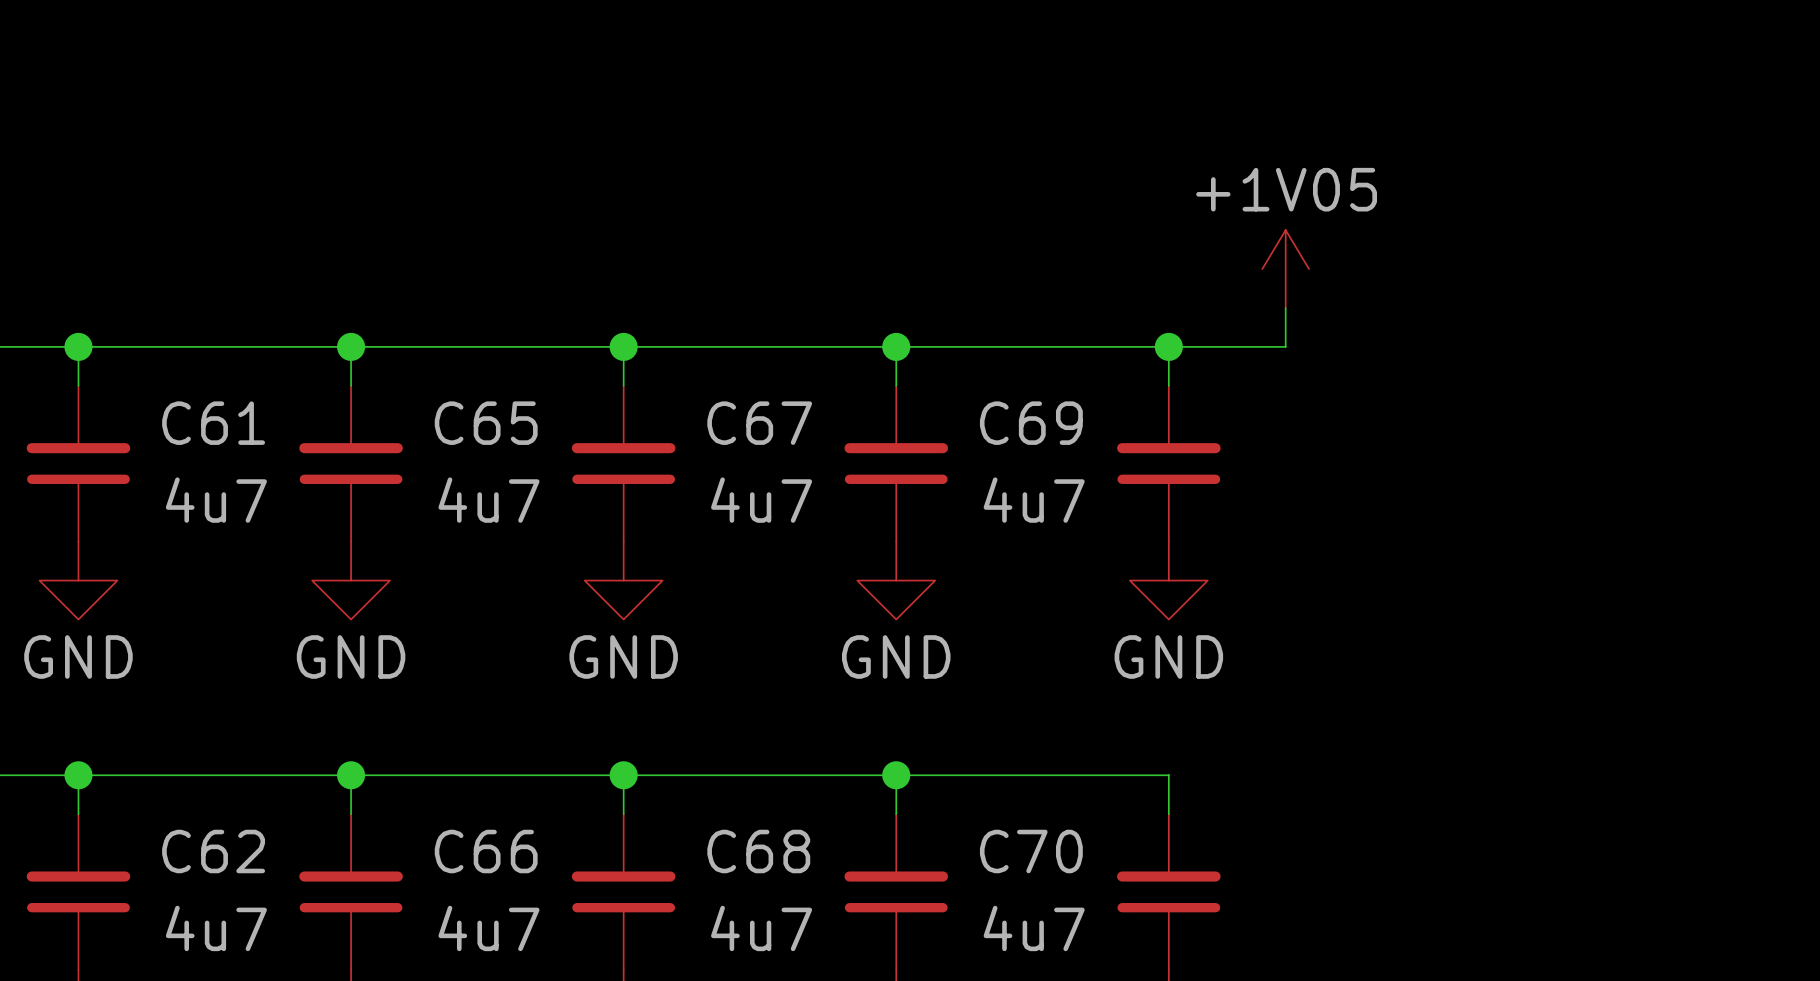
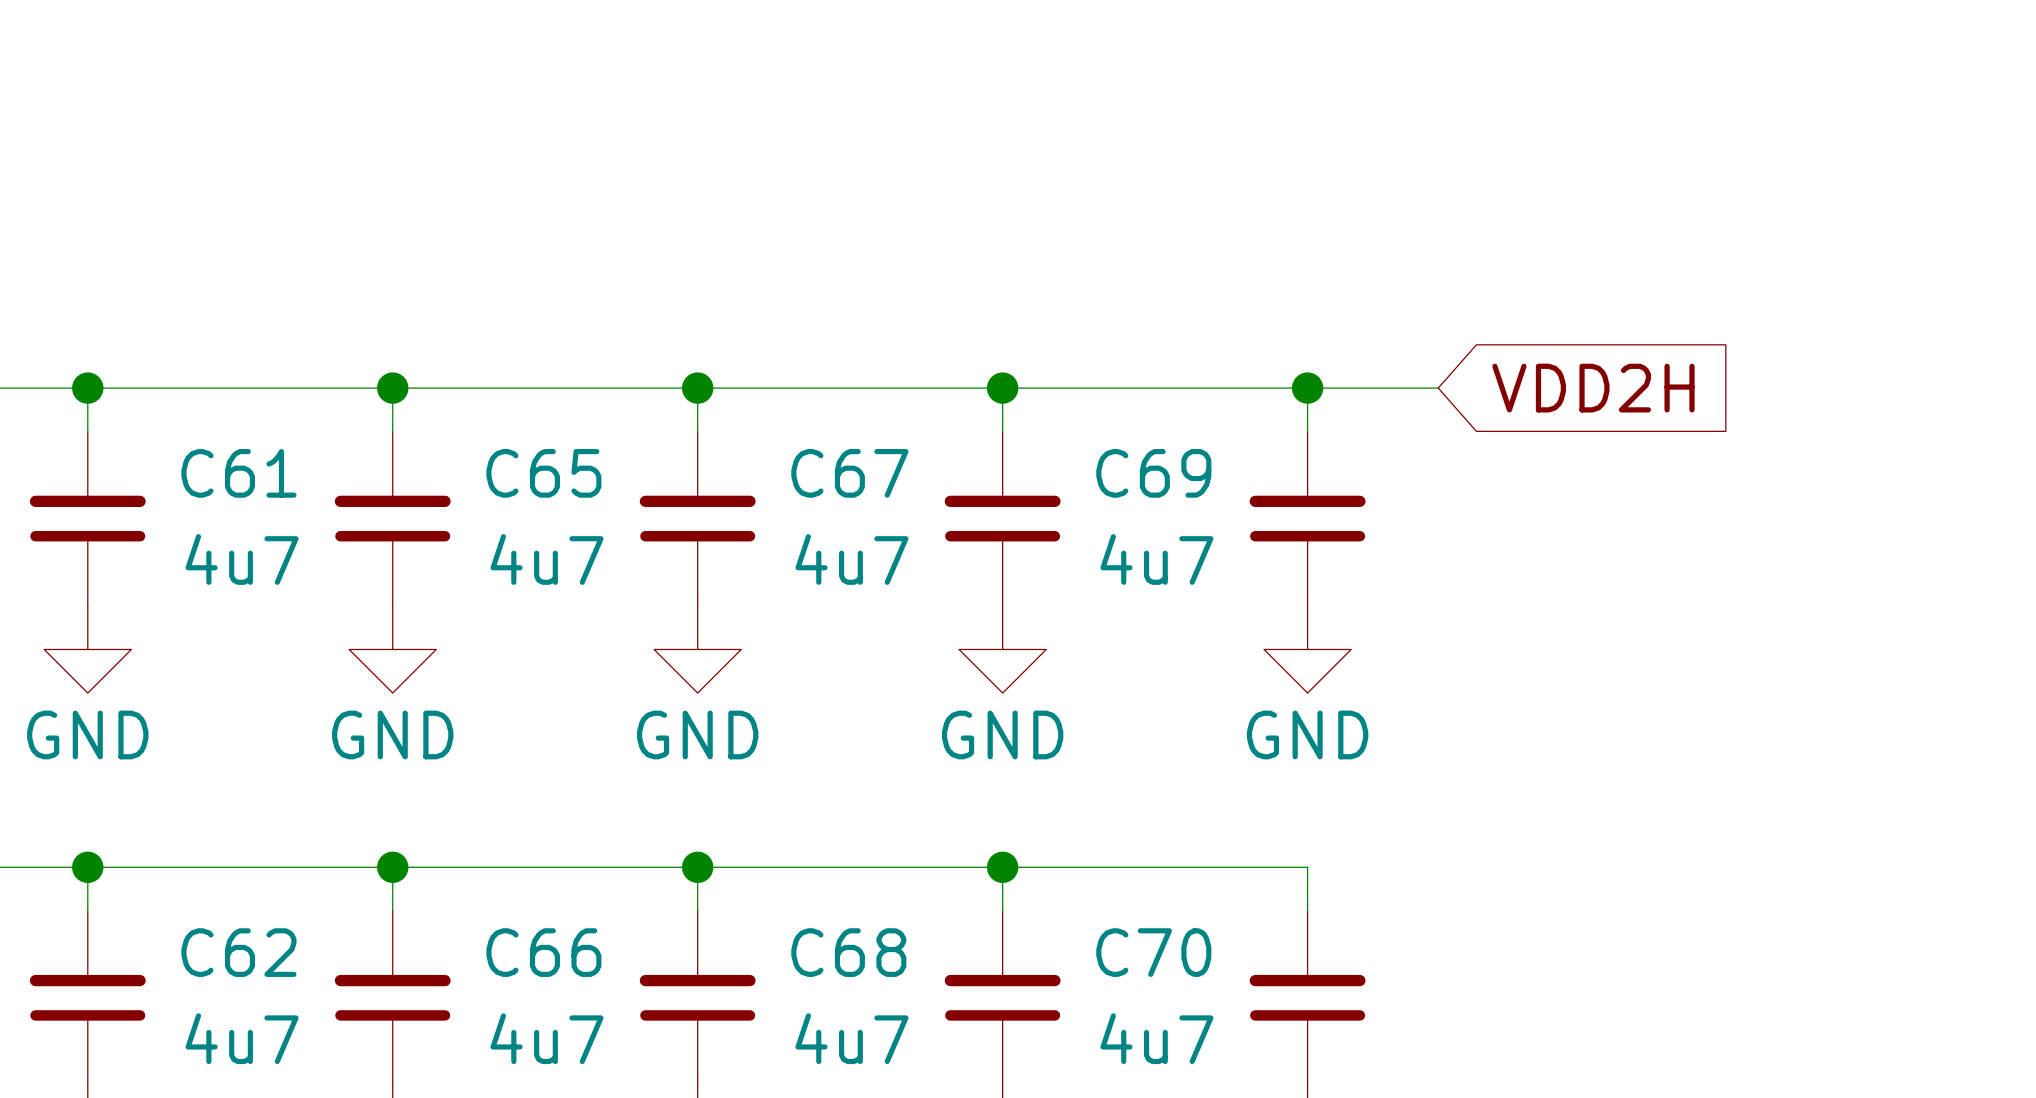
power symbol: +1V05 (1285, 269) -> none
wire: (1285, 307) (1285, 346) -> none
global label: none -> VDD2H (1593, 388)

